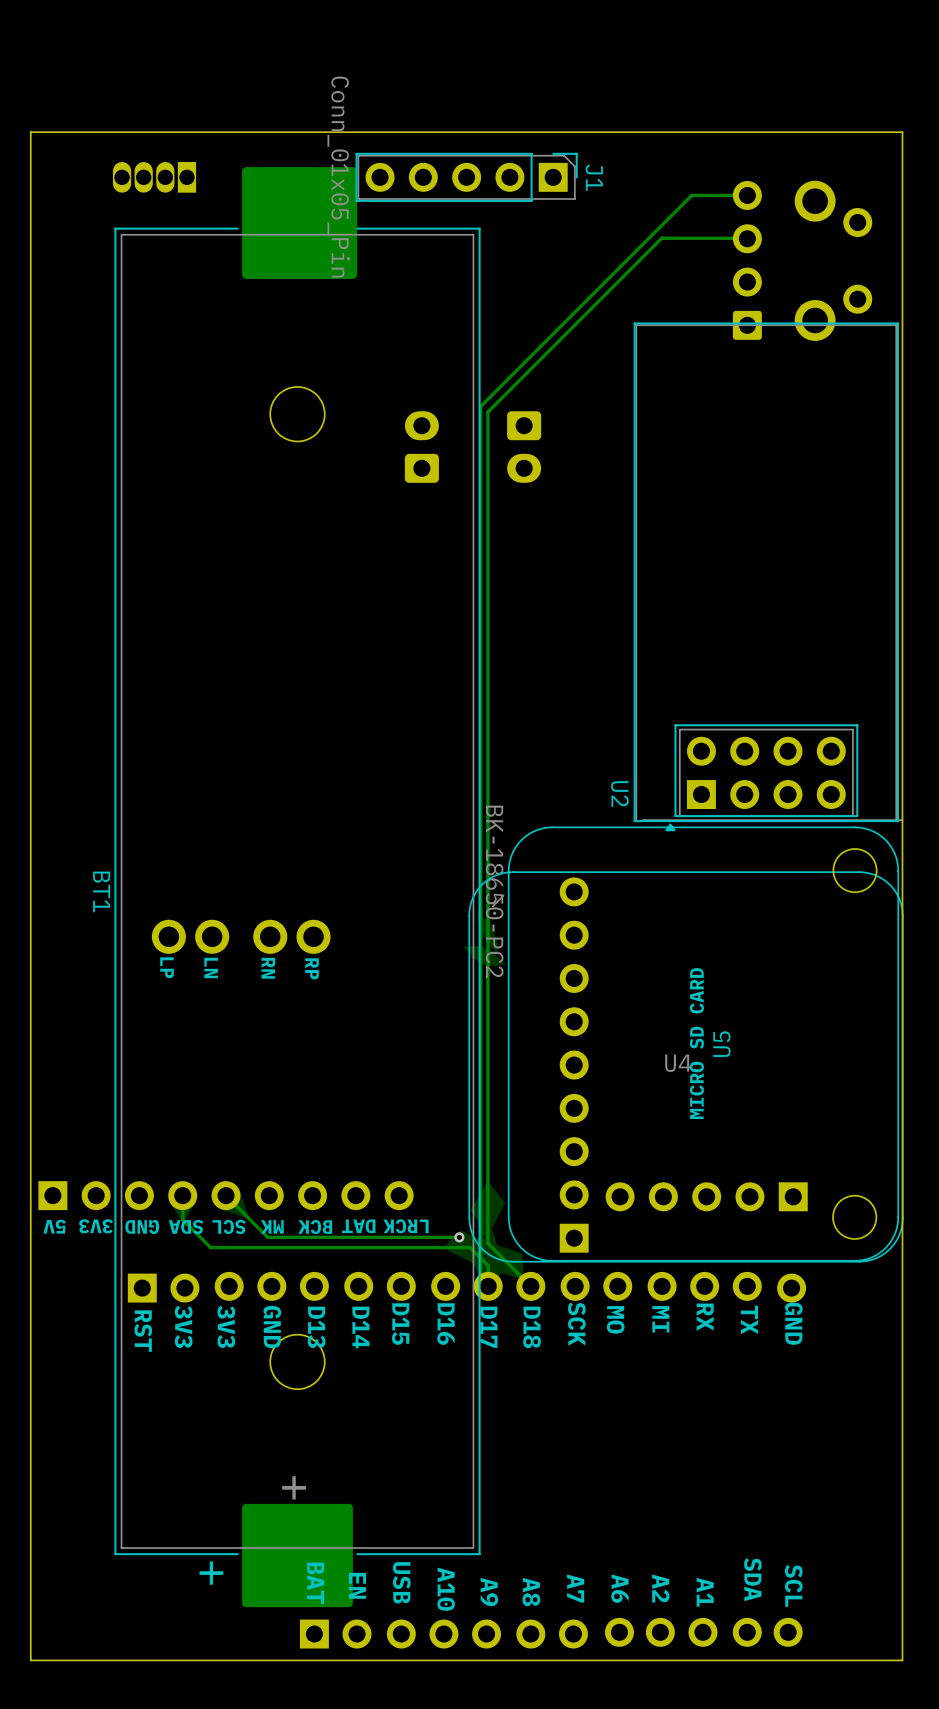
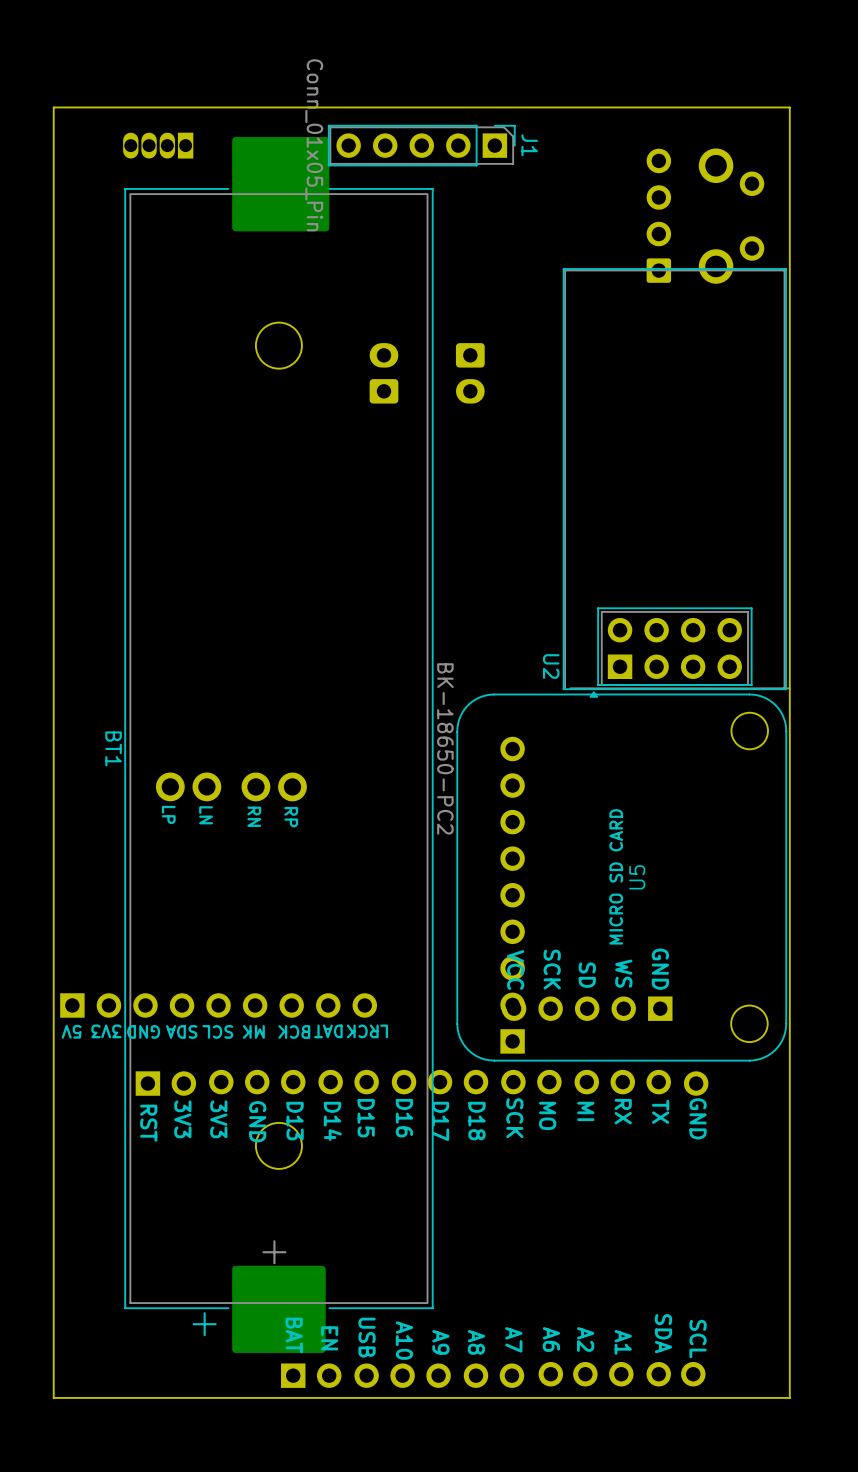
track: (747, 195) (691, 195) (480, 406) (480, 1278) (488, 1286) (488, 1265) (470, 1247) (210, 1247) (182, 1219) (182, 1195) -> none
track: (747, 232) (747, 238) (661, 238) (487, 412) (487, 1243) (530, 1286) -> none
U4 side: bottom (686, 1066) -> top (587, 1008)
track: (226, 1195) (267, 1237) (459, 1237) -> none
via: (459, 1237) -> none

